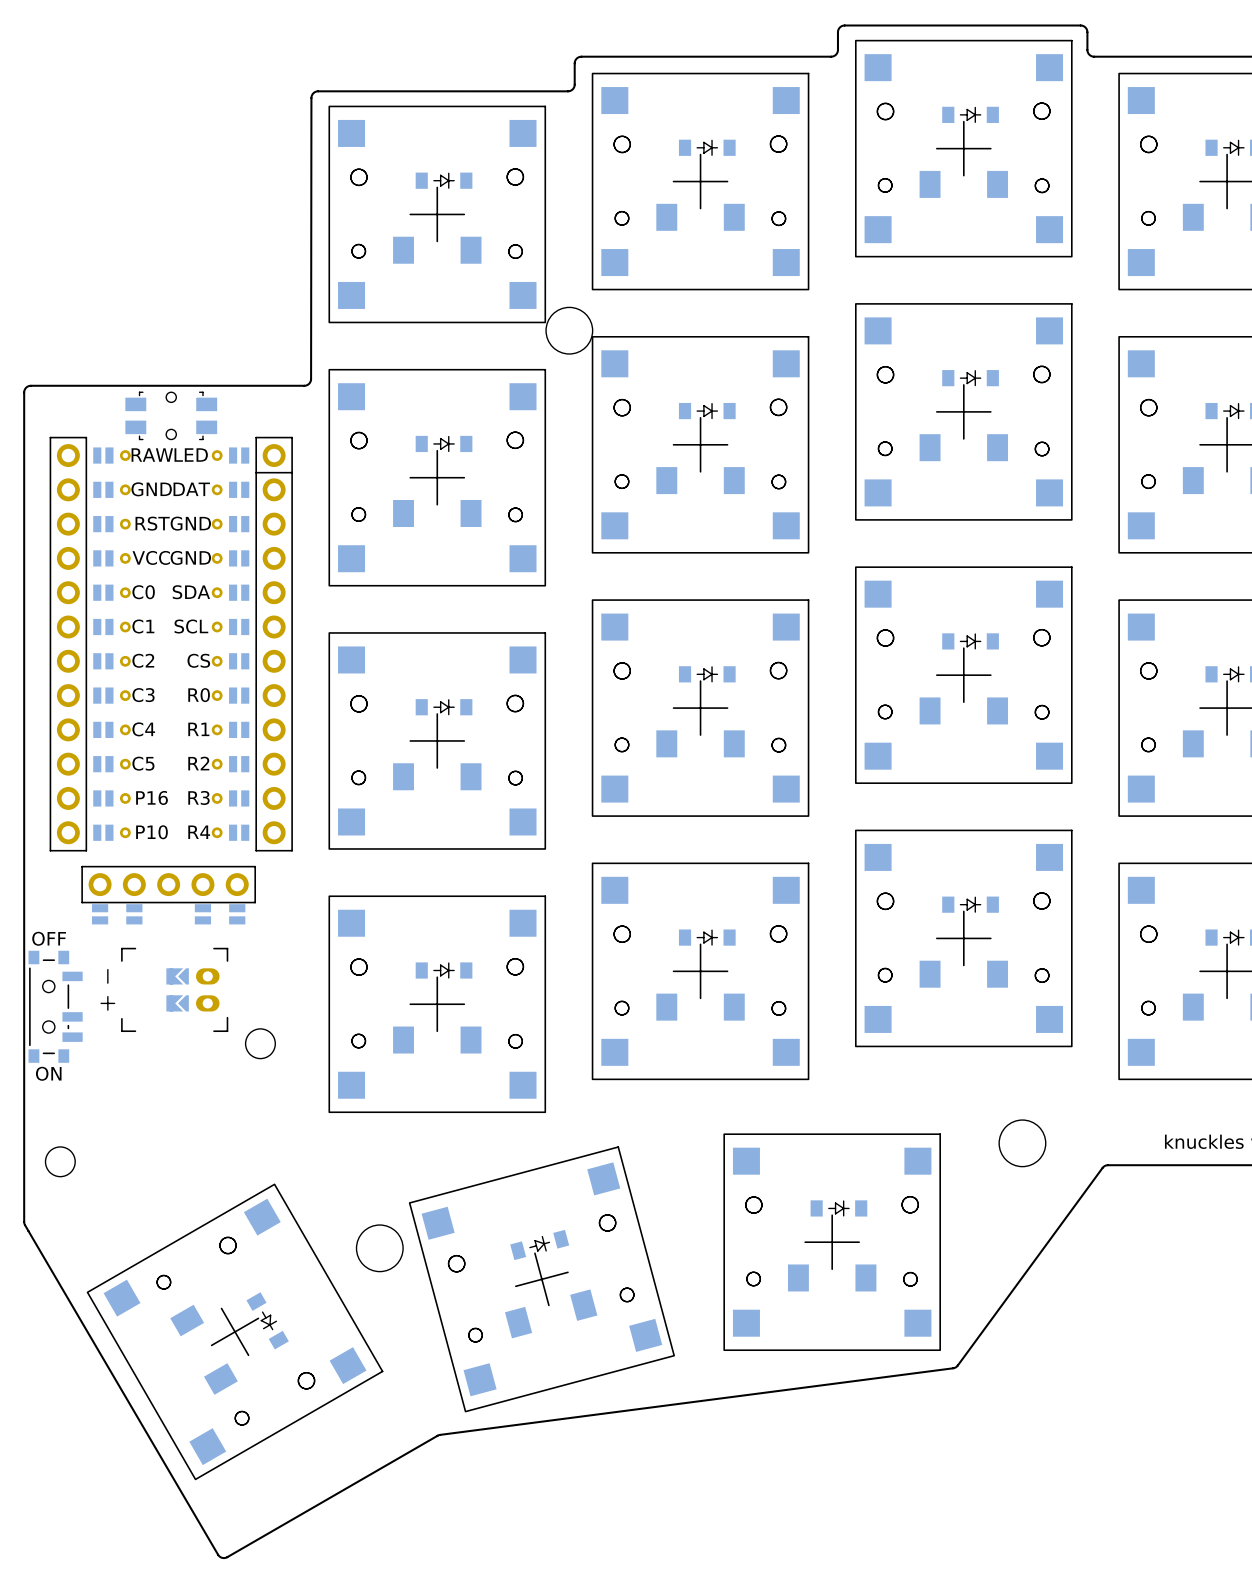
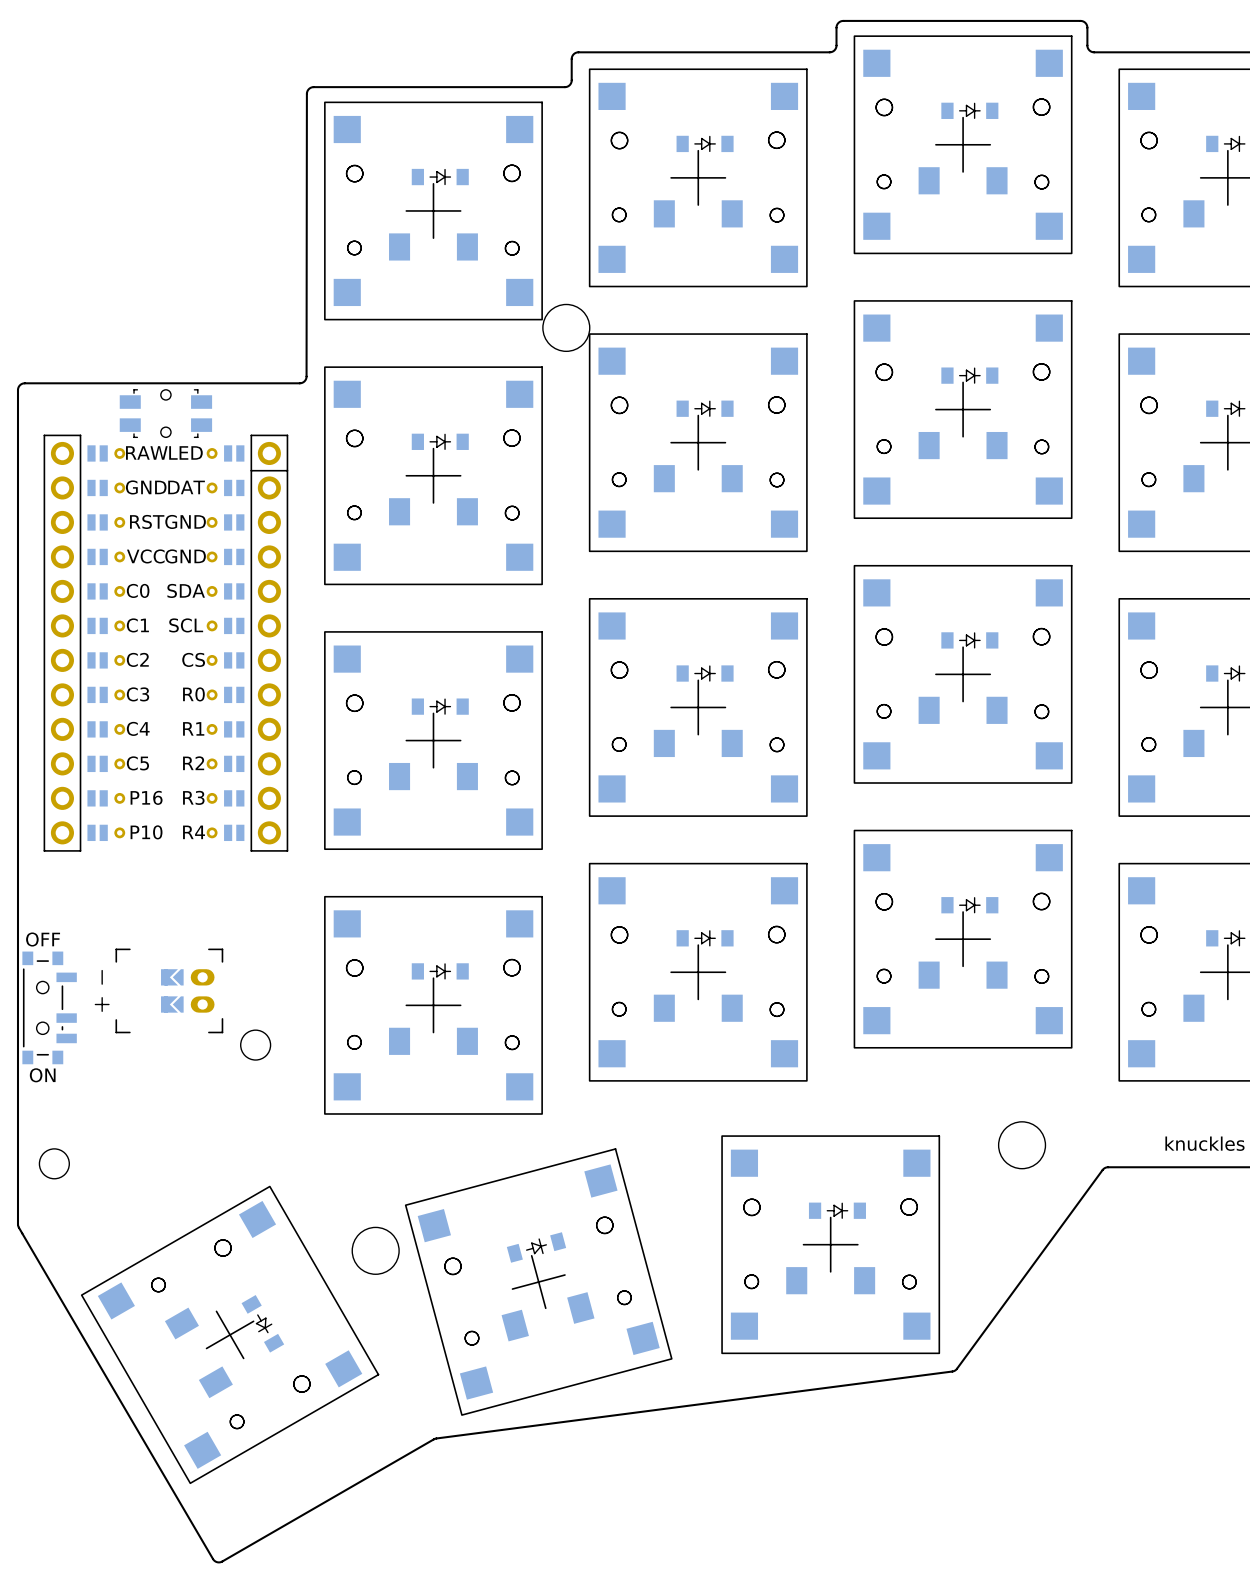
part: (168, 895) -> none

